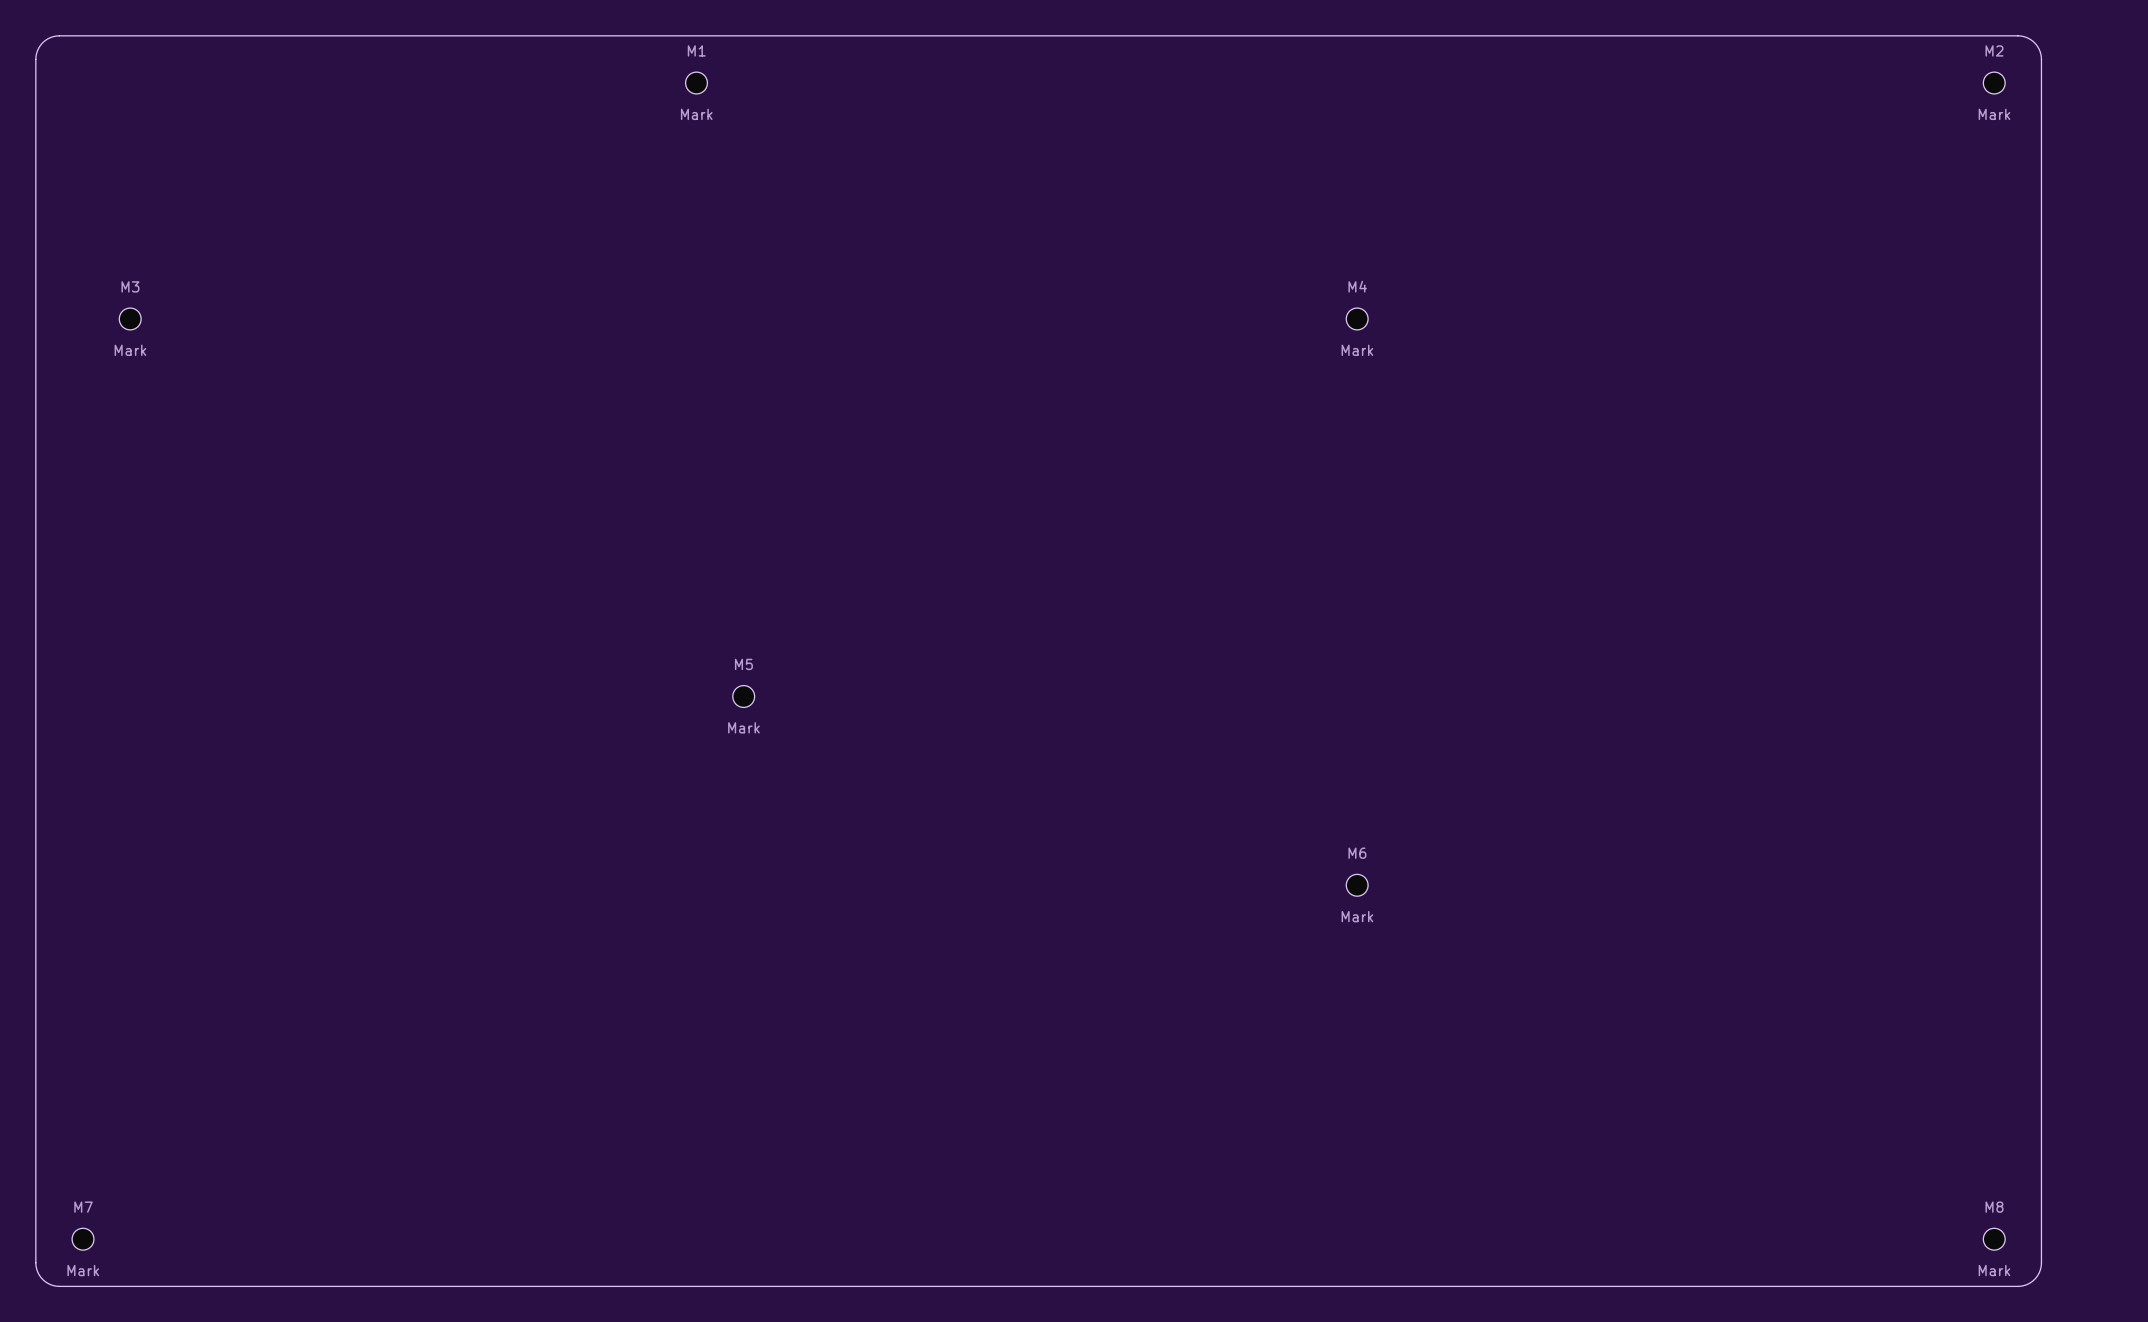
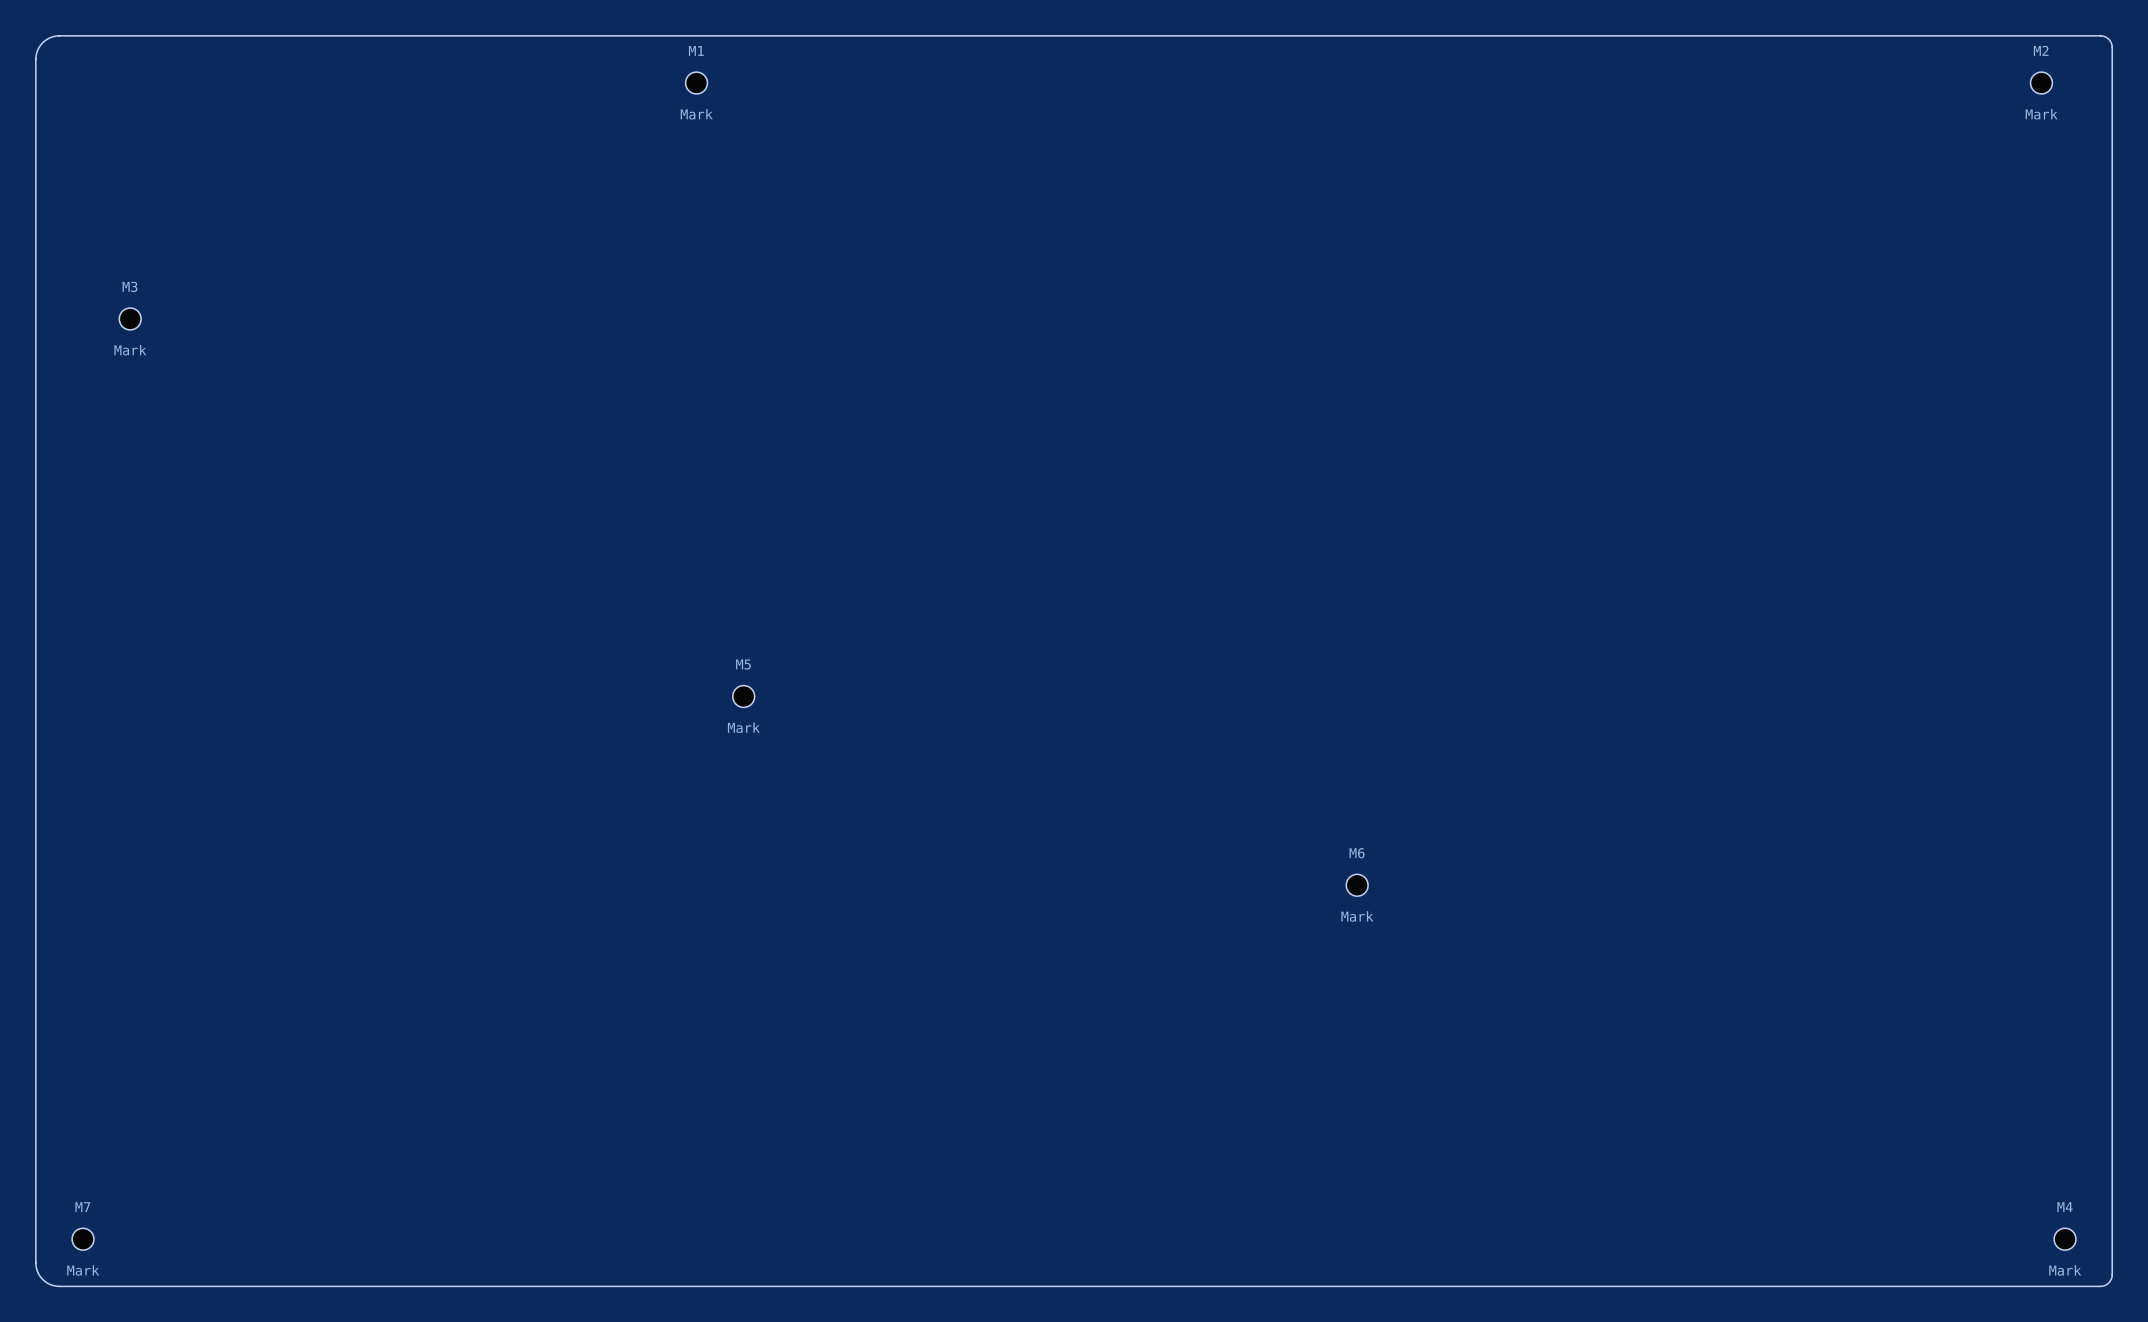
board edge: (2017, 35) (2028, 38) (2034, 42) (2039, 49) (2041, 59) (2041, 1262) (2040, 1270) (2034, 1279) (2025, 1285) (2017, 1286) -> (2017, 35) (2101, 35) (2109, 40) (2112, 47) (2112, 1276) (2108, 1282) (2101, 1286) (2017, 1286)
M2 position: (1994, 83) -> (2041, 83)
M4 position: (1357, 318) -> (2065, 1239)
M8: Mark (1994, 1239) -> none

